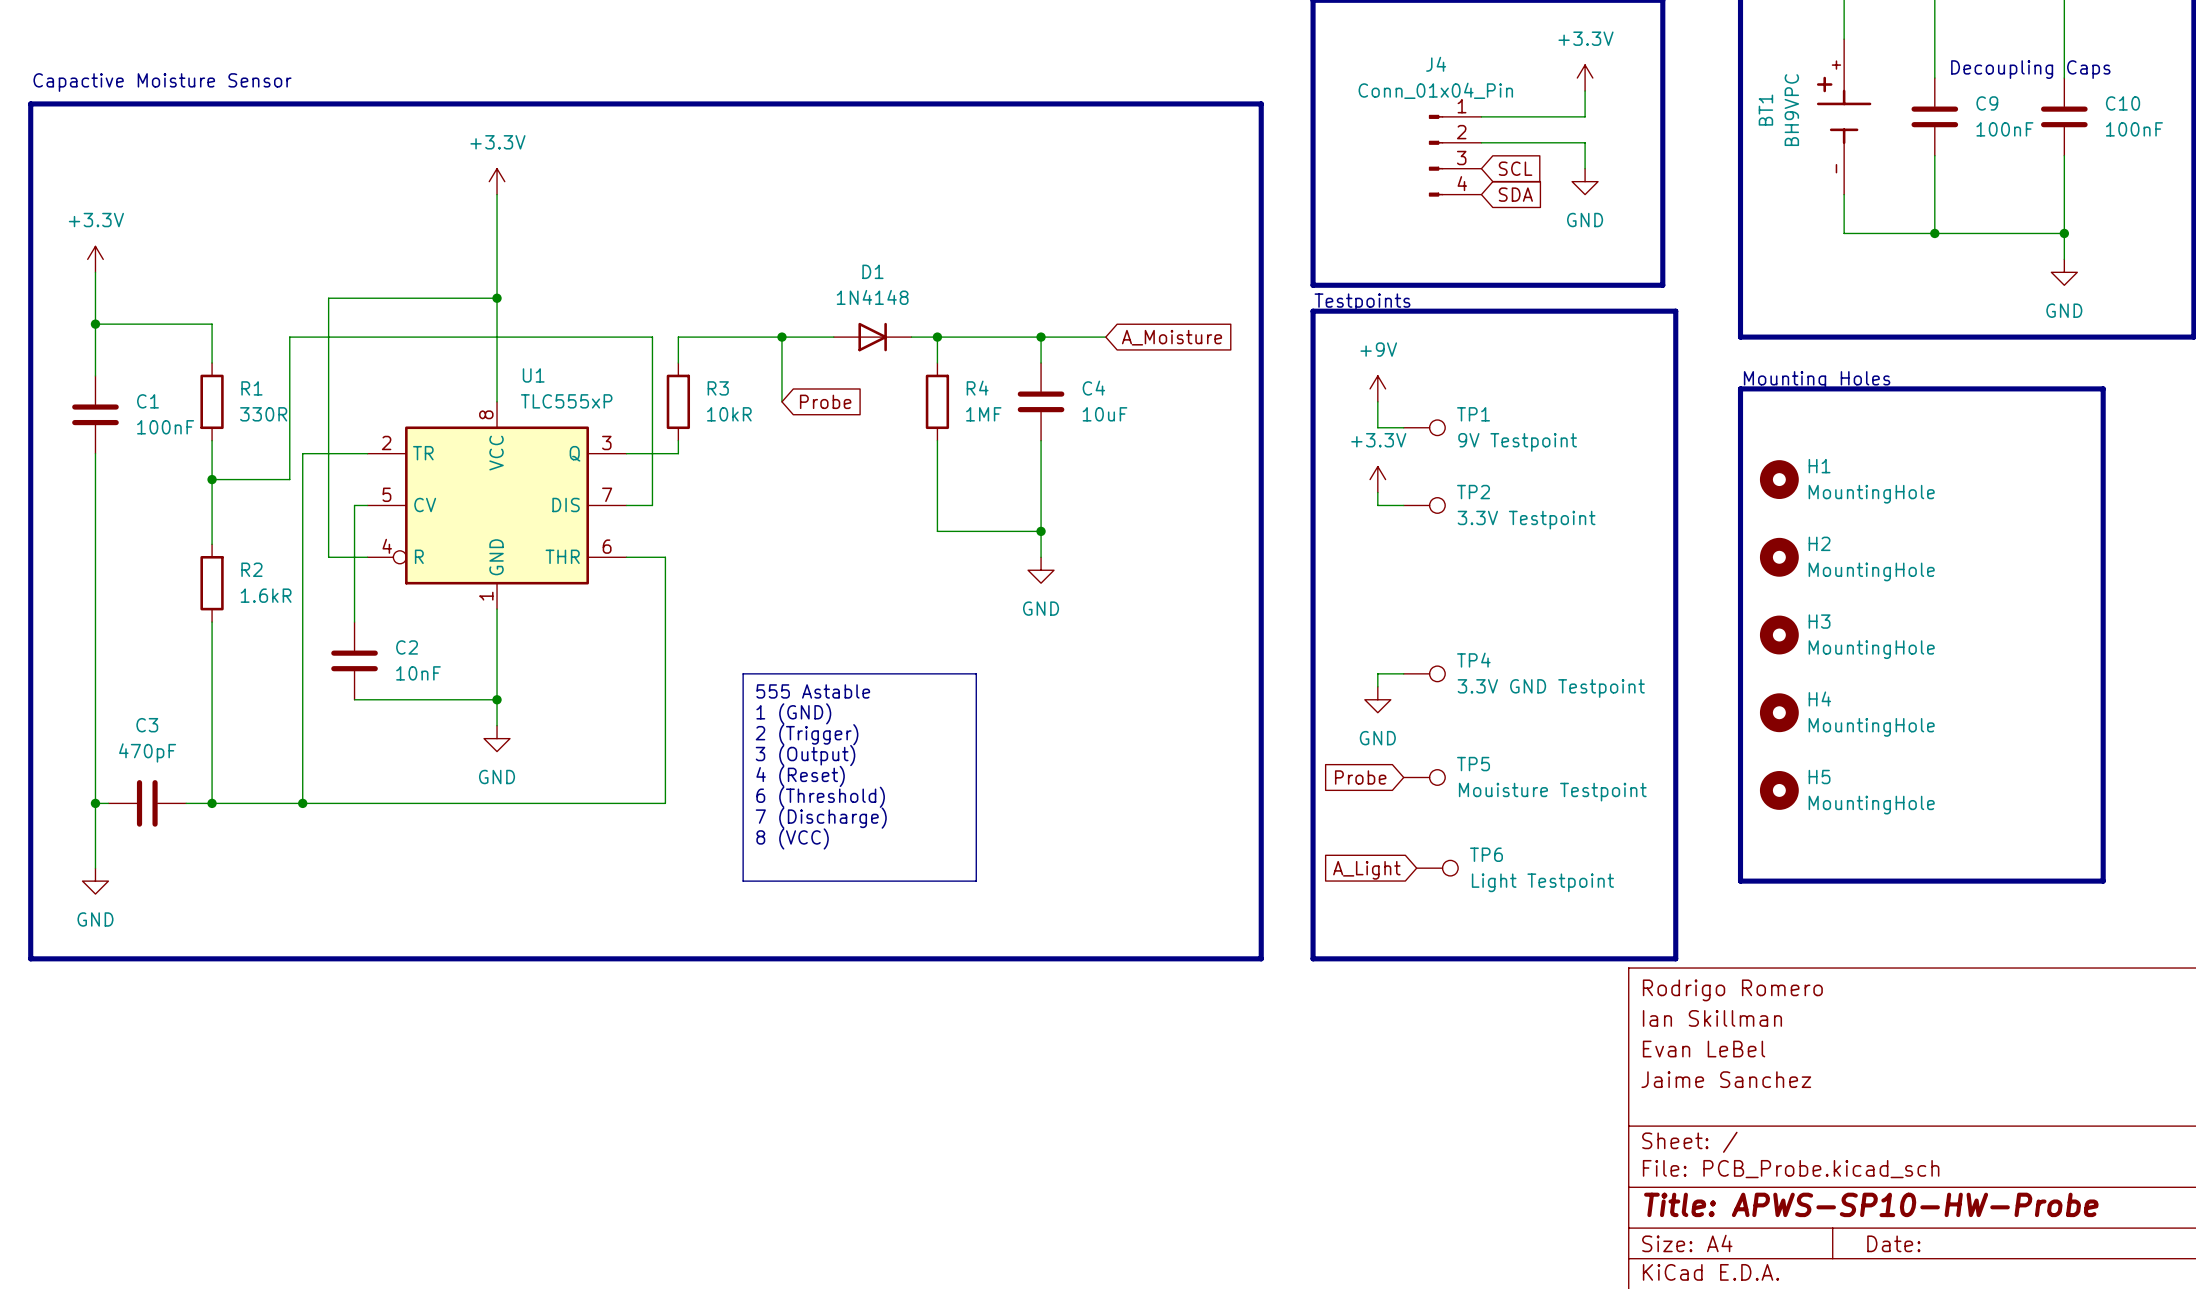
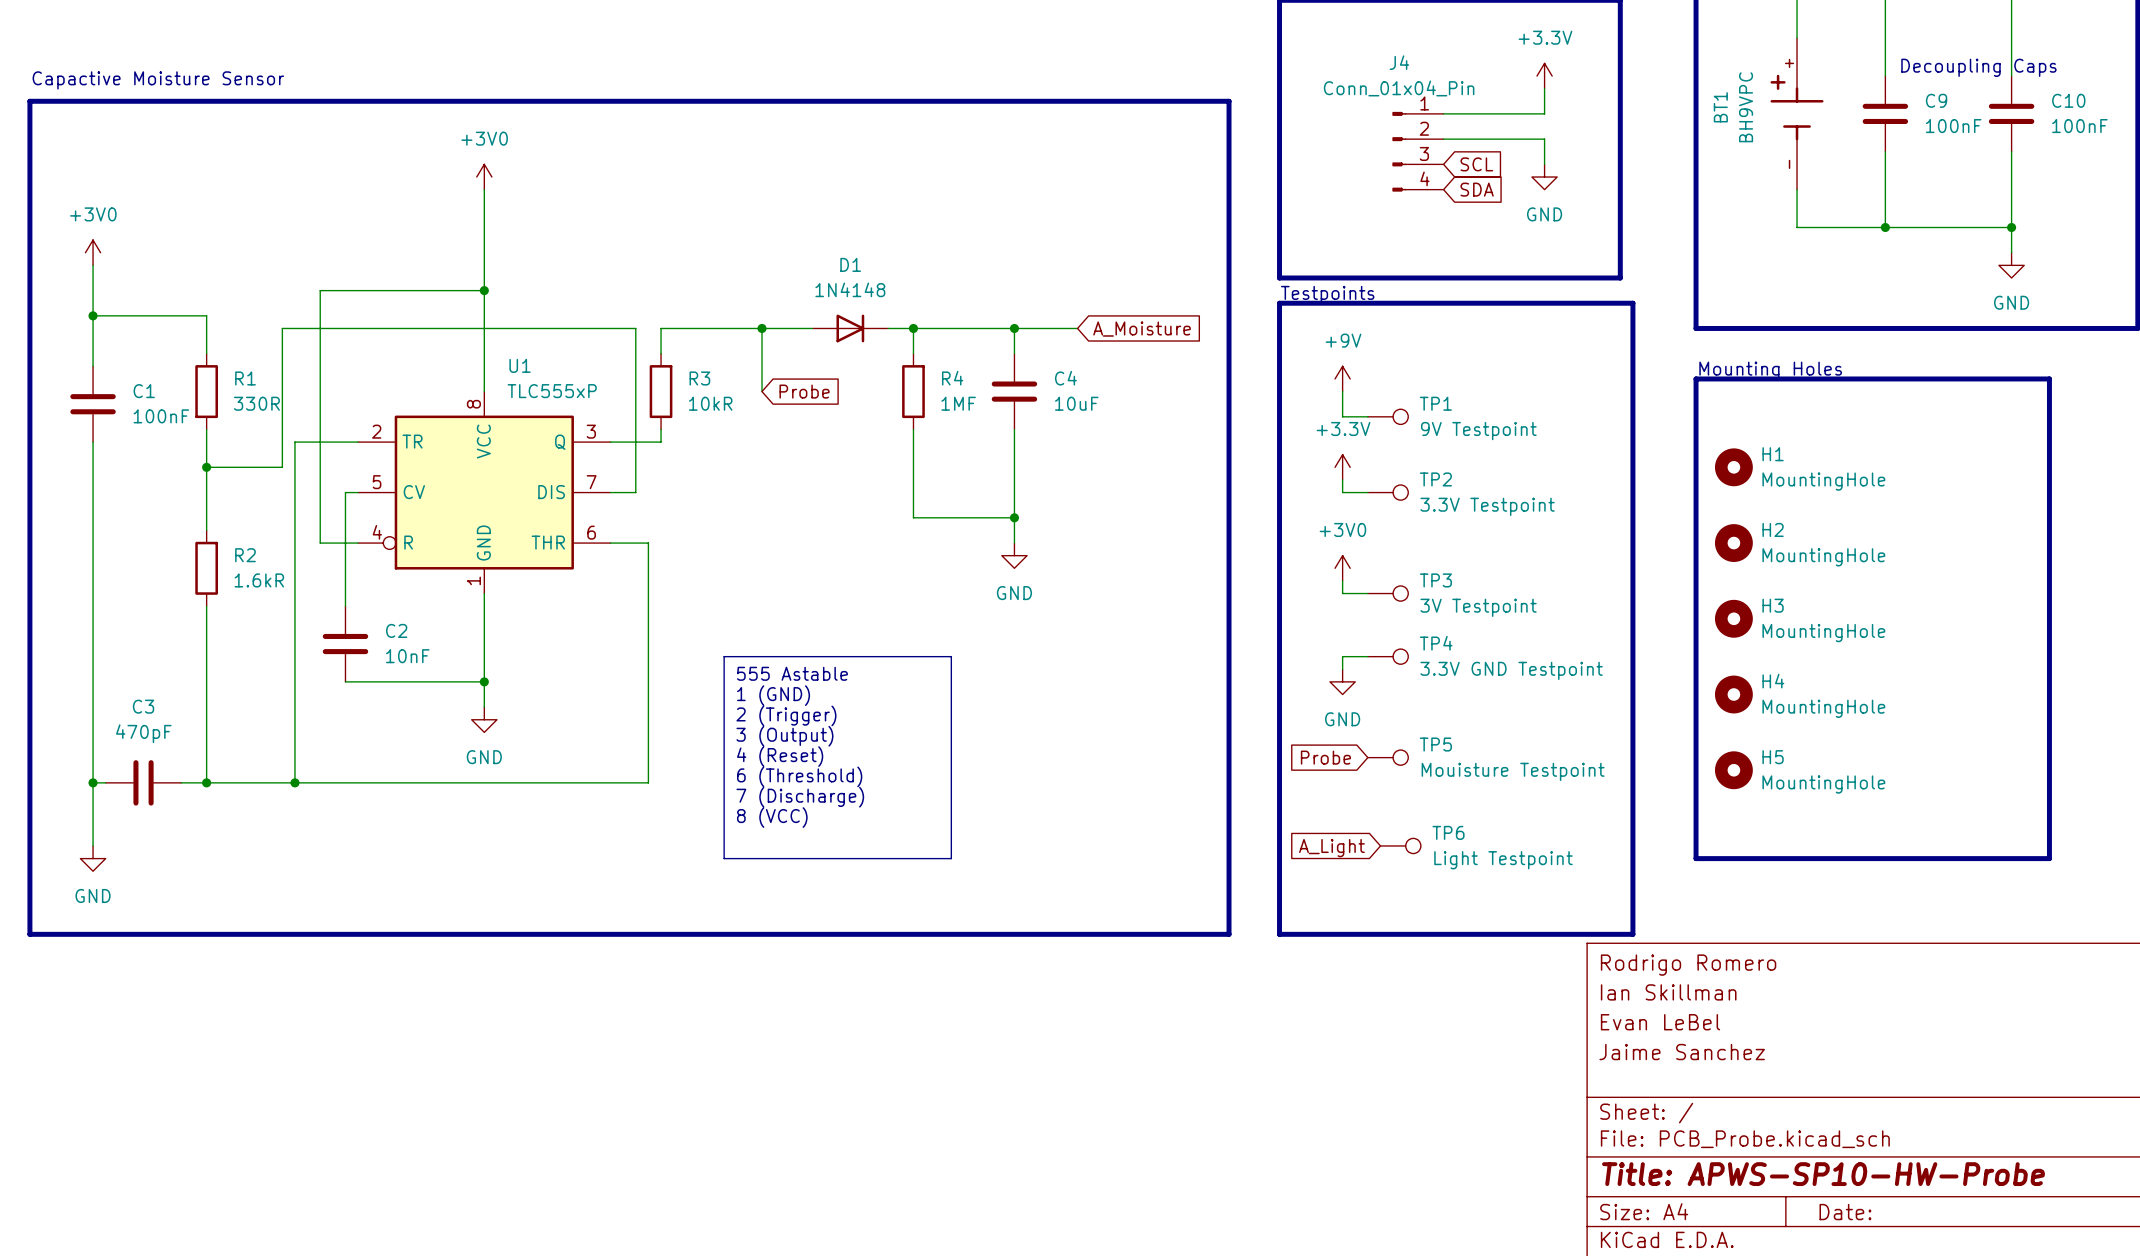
power symbol: +3.3V (497, 181) -> +3V0 (484, 177)
power symbol: +3.3V (95, 259) -> +3V0 (93, 252)
power symbol: none -> +3V0 (1342, 568)
wire: none -> (1342, 580) (1342, 593) (1367, 593)
TP3: none -> 3V Testpoint (1388, 593)

